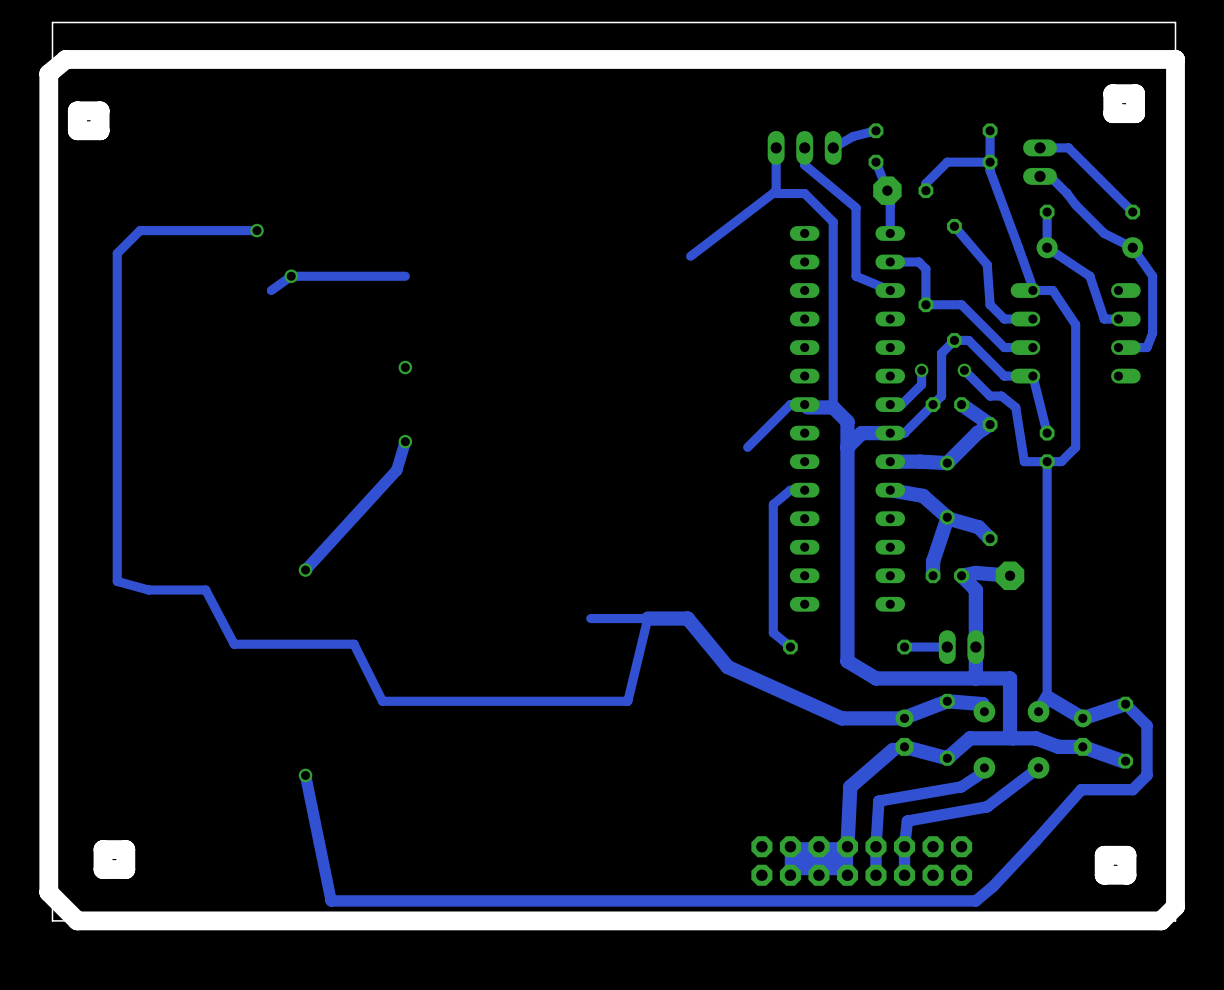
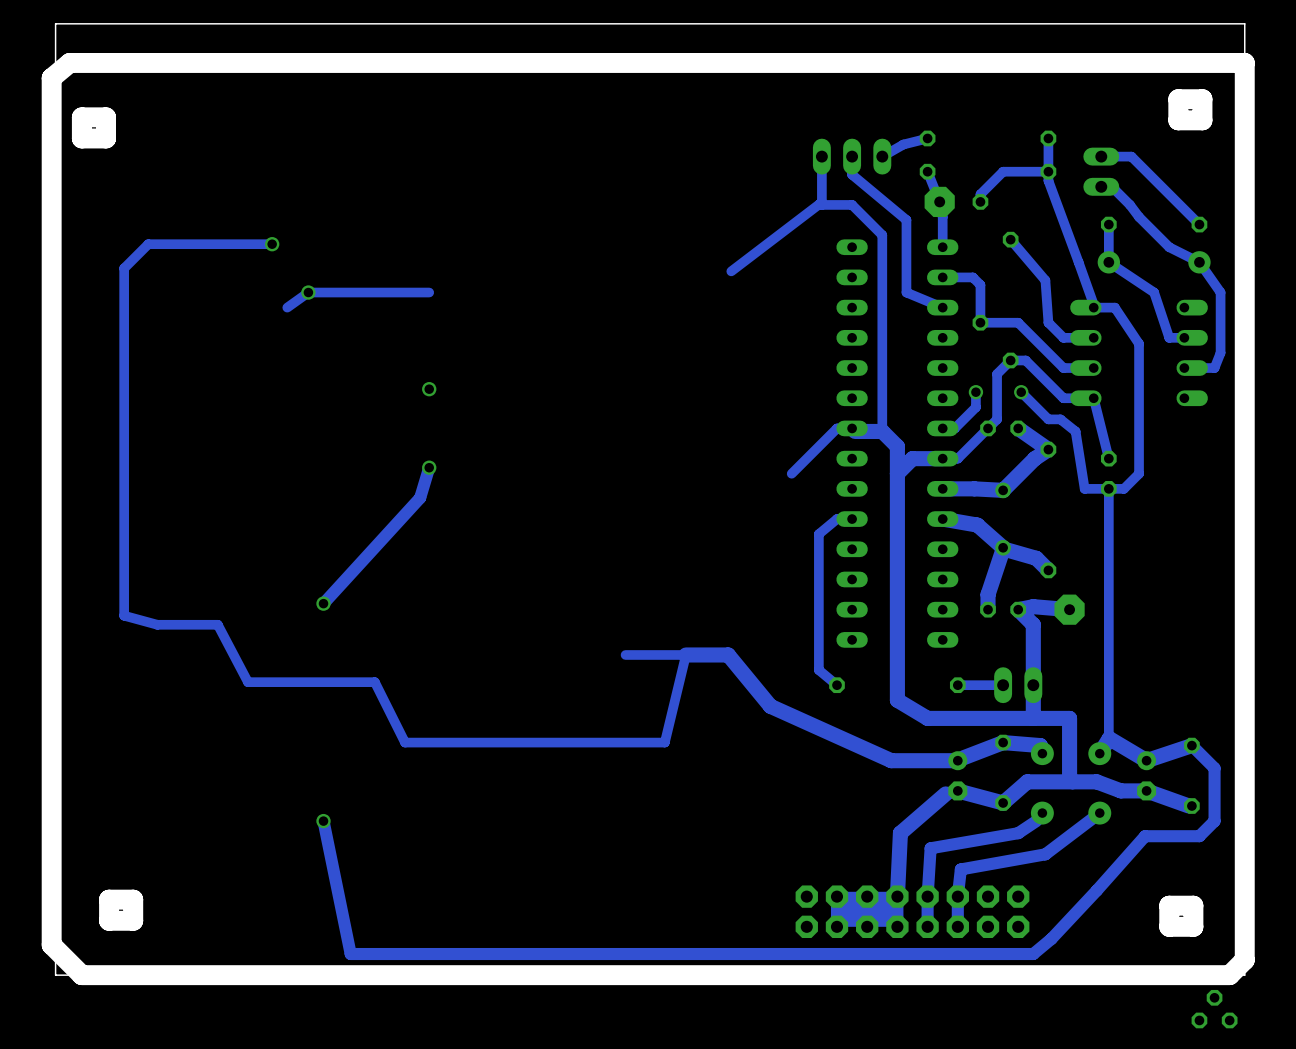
part: none -> (1214, 1009)

